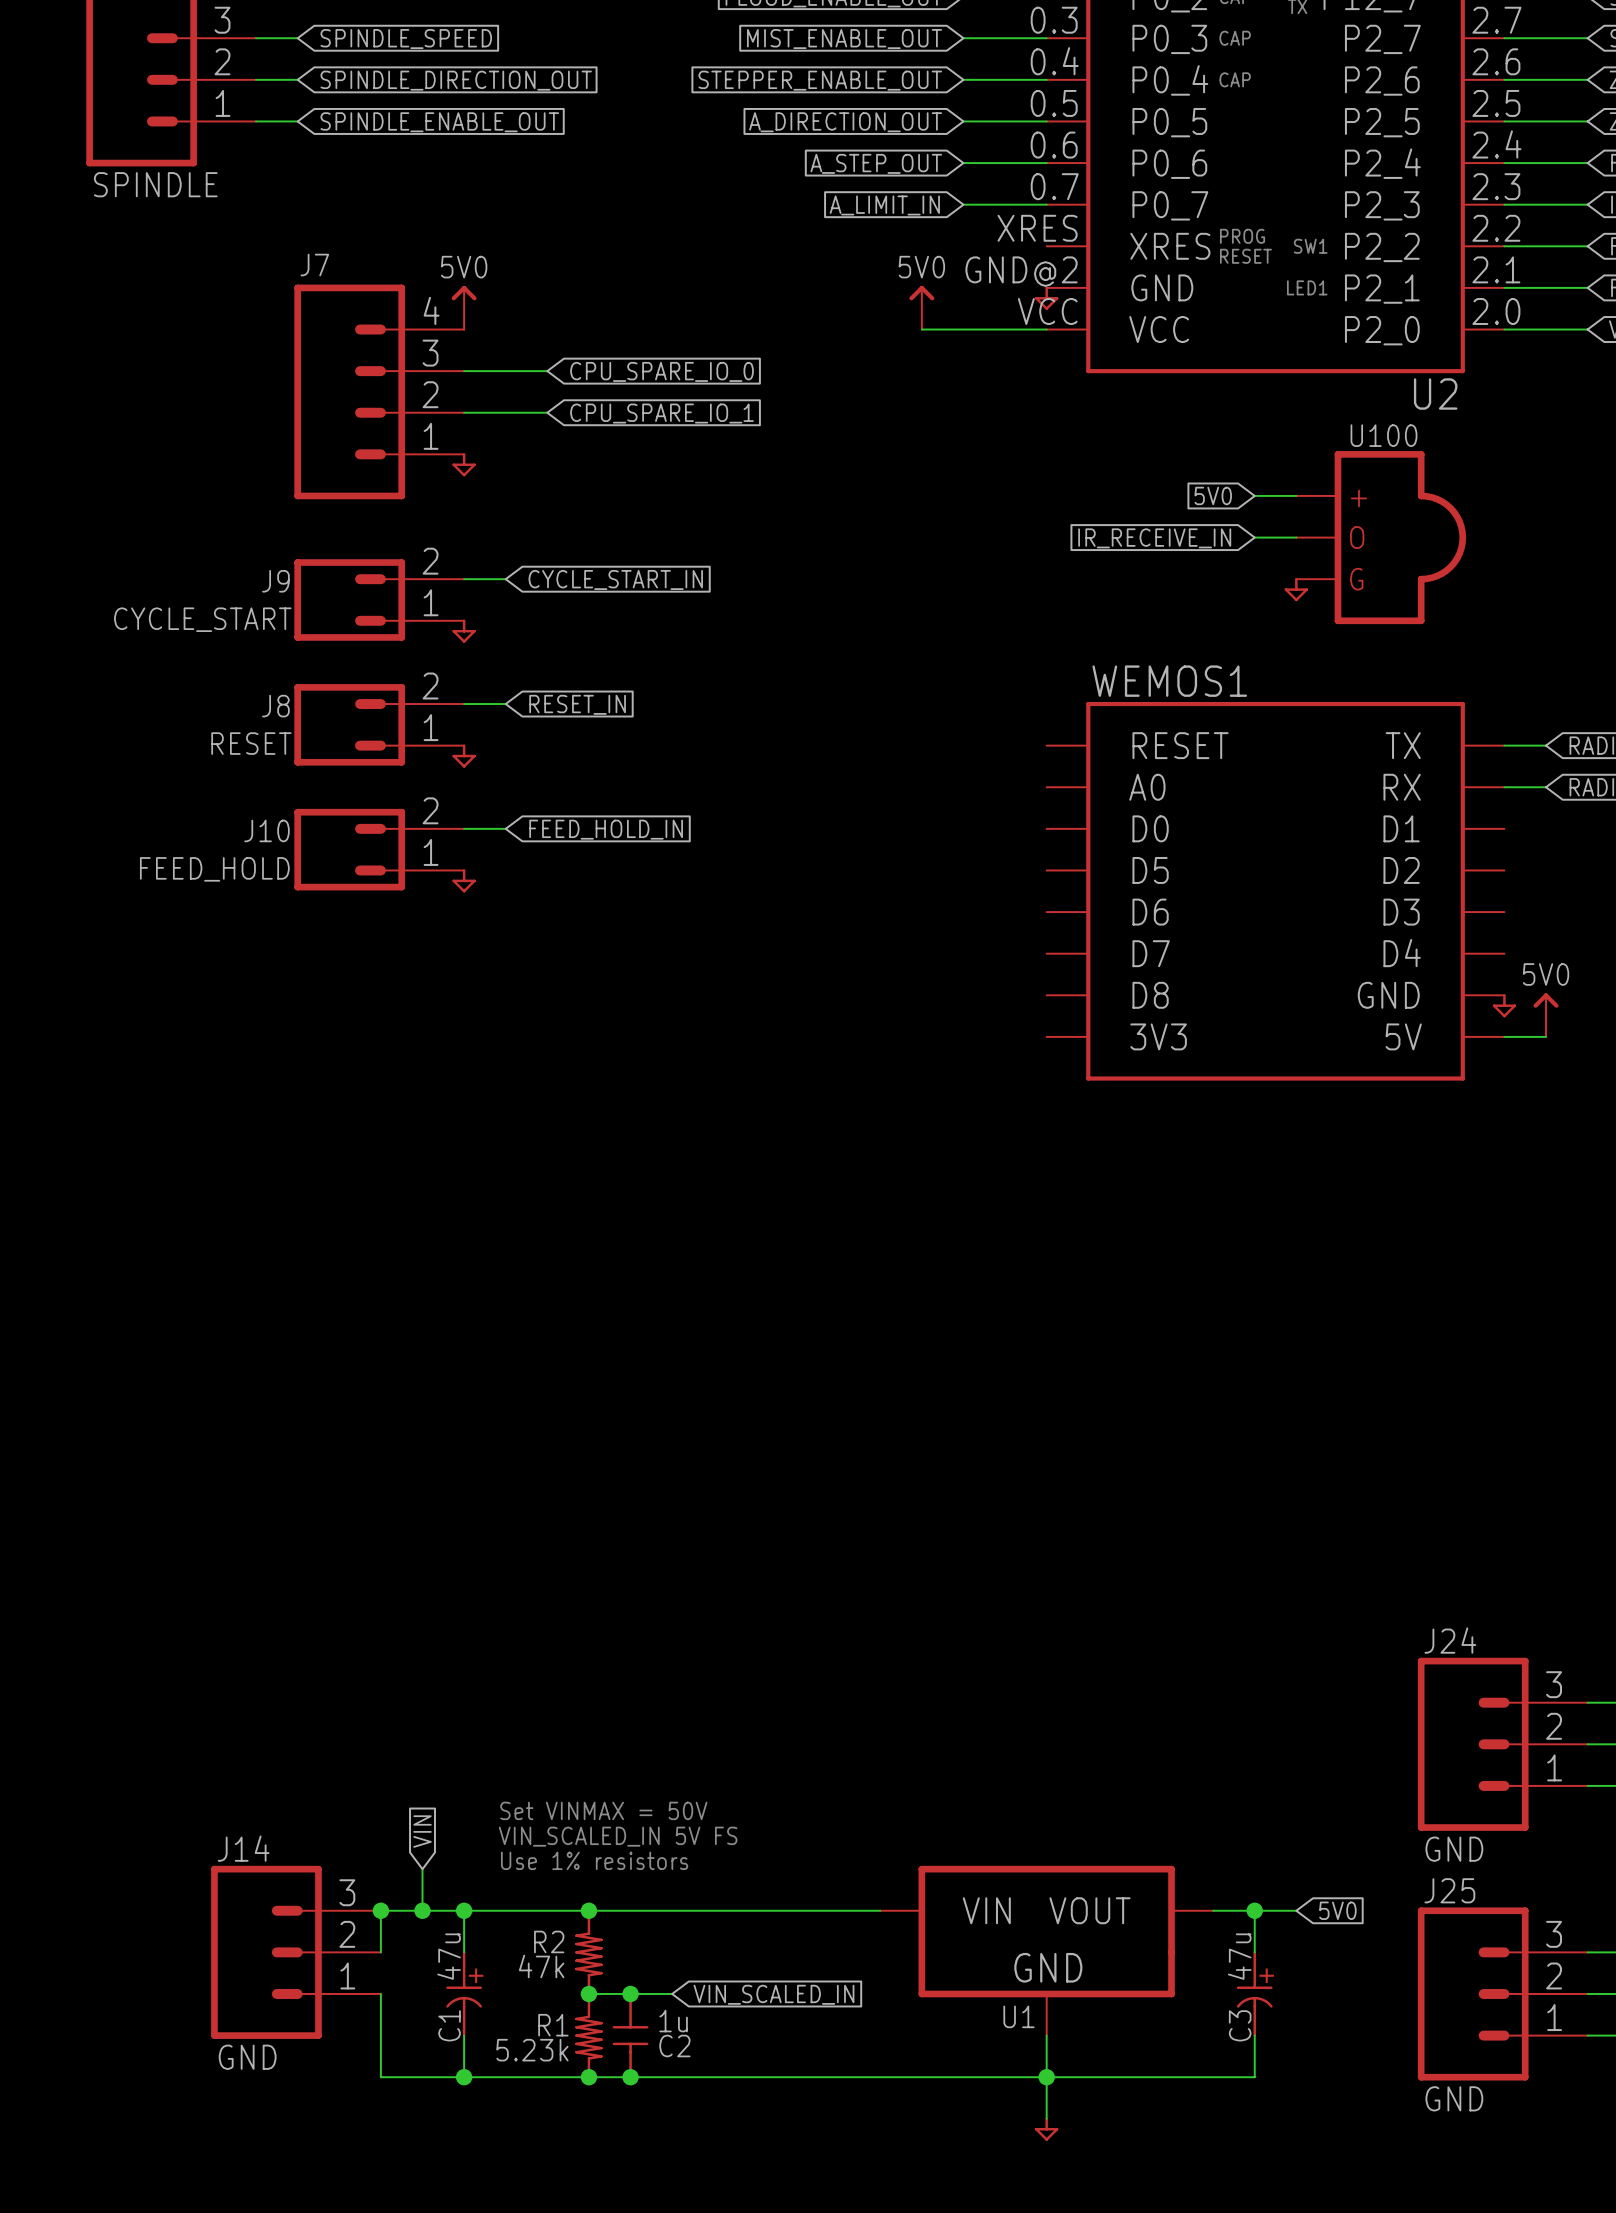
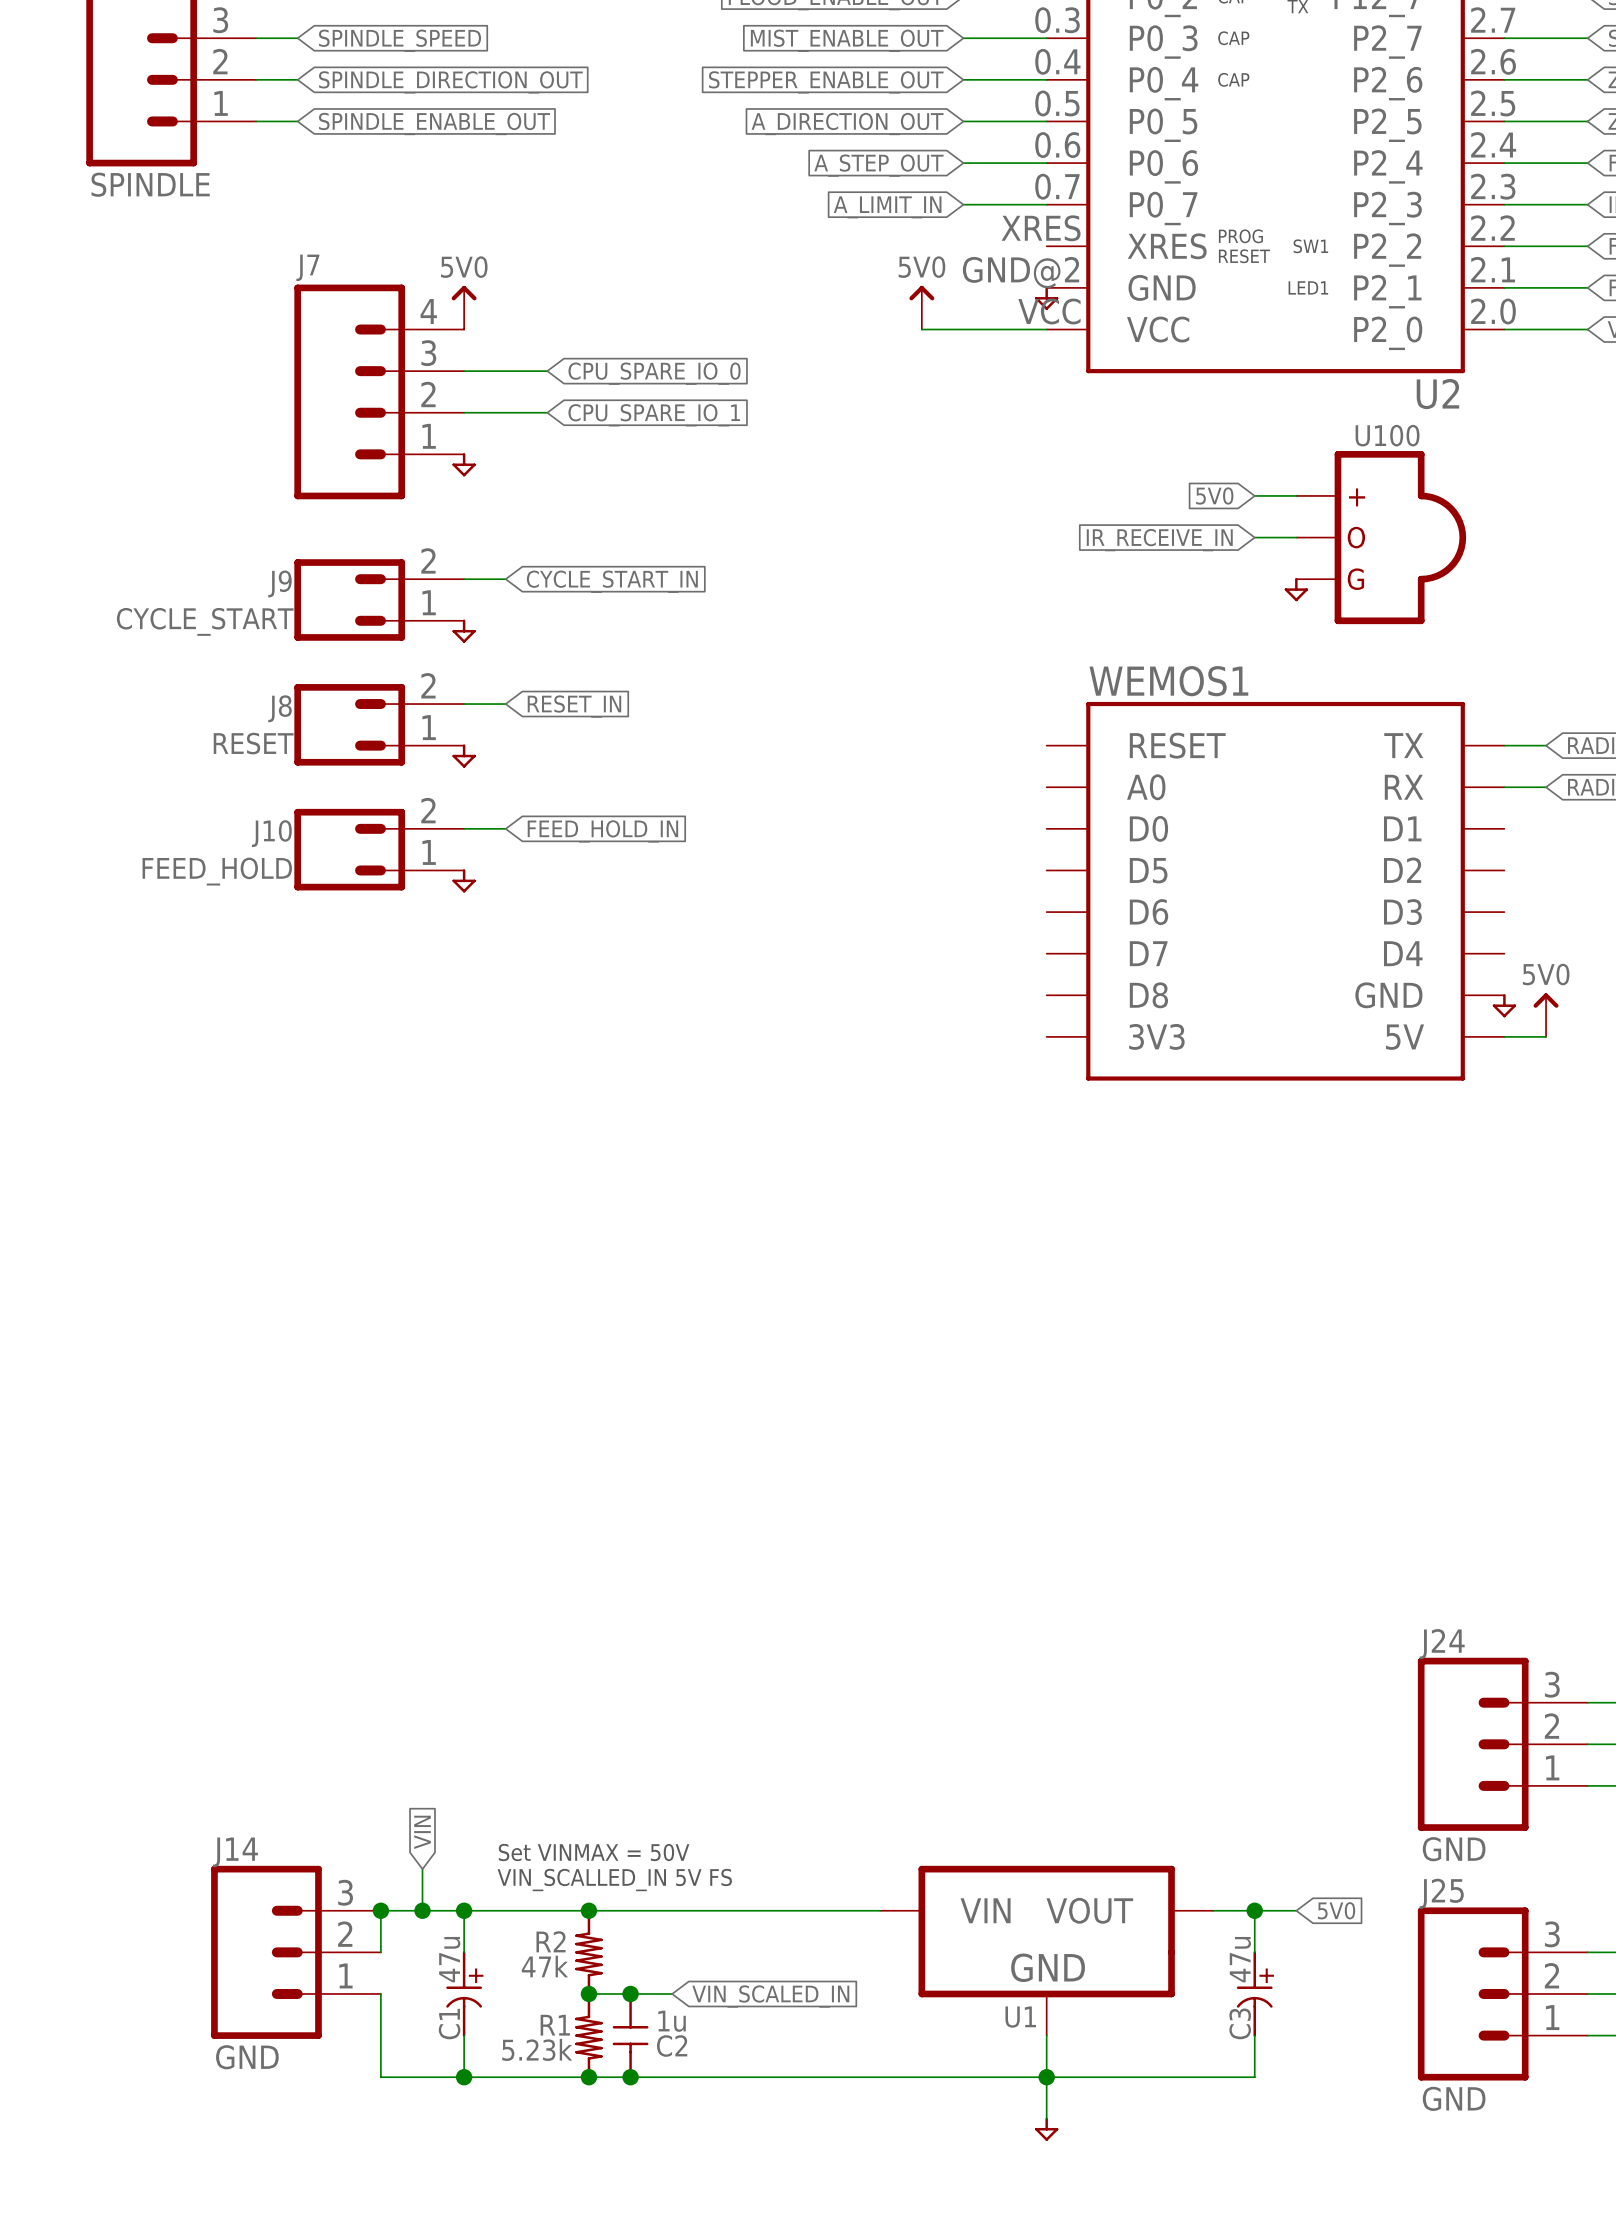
text position: Set VINMAX = 50V (603, 1810) -> Set VINMAX = 50V (594, 1852)
text: VIN_SCALED_IN 5V FS (618, 1836) -> none
text: Use 1% resistors (594, 1860) -> none
text: none -> VIN_SCALLED_IN 5V FS (614, 1880)

